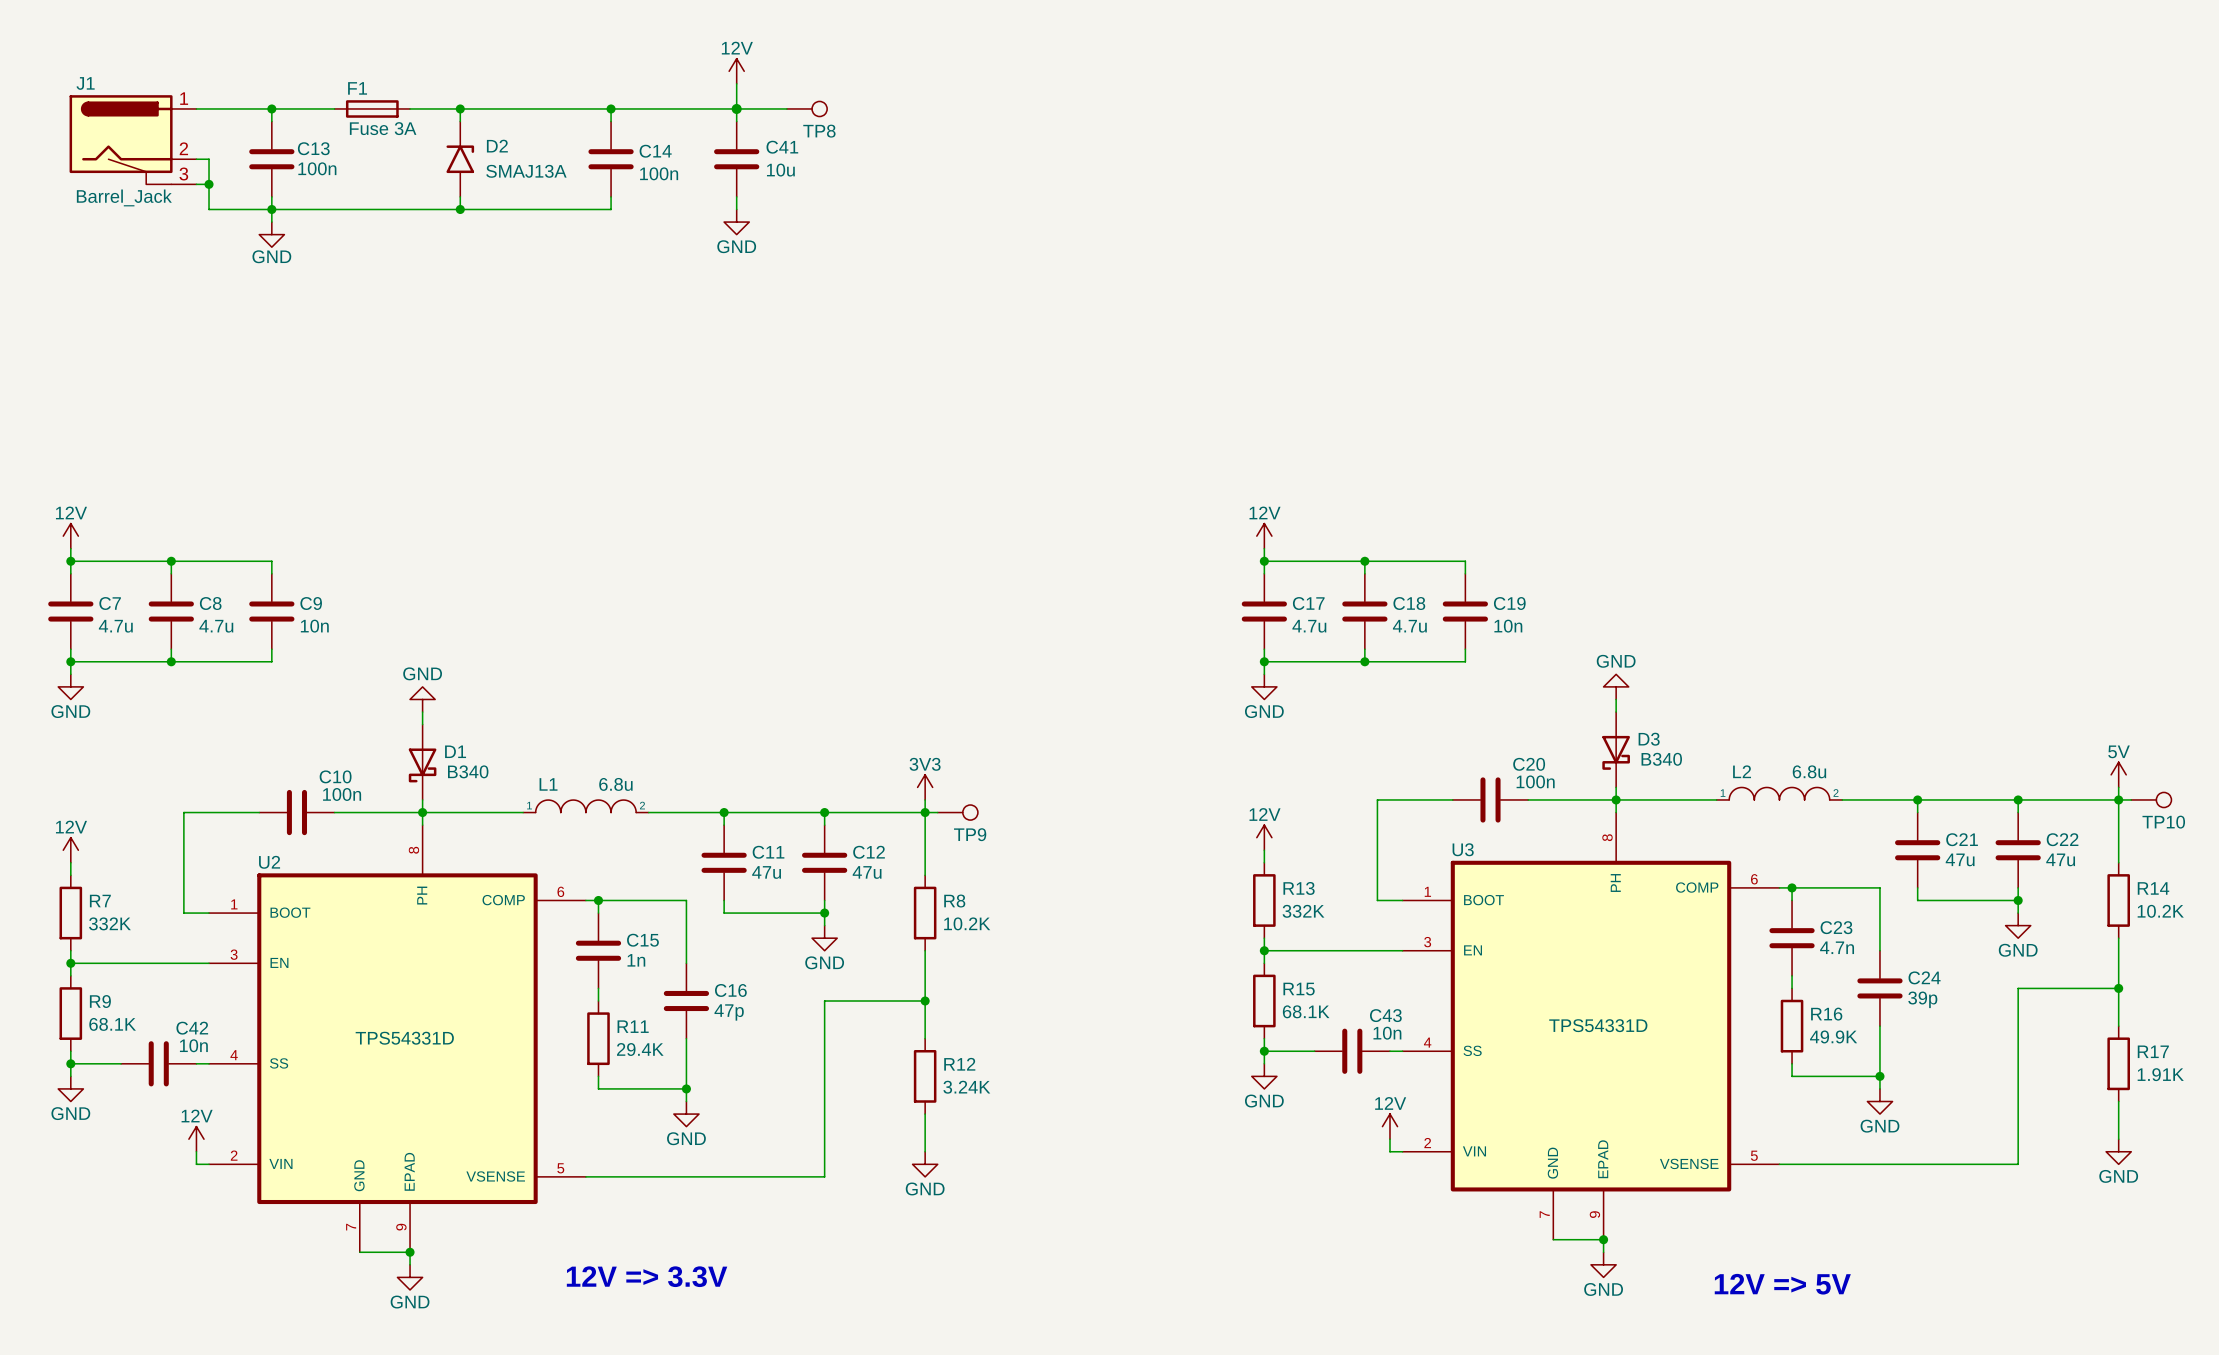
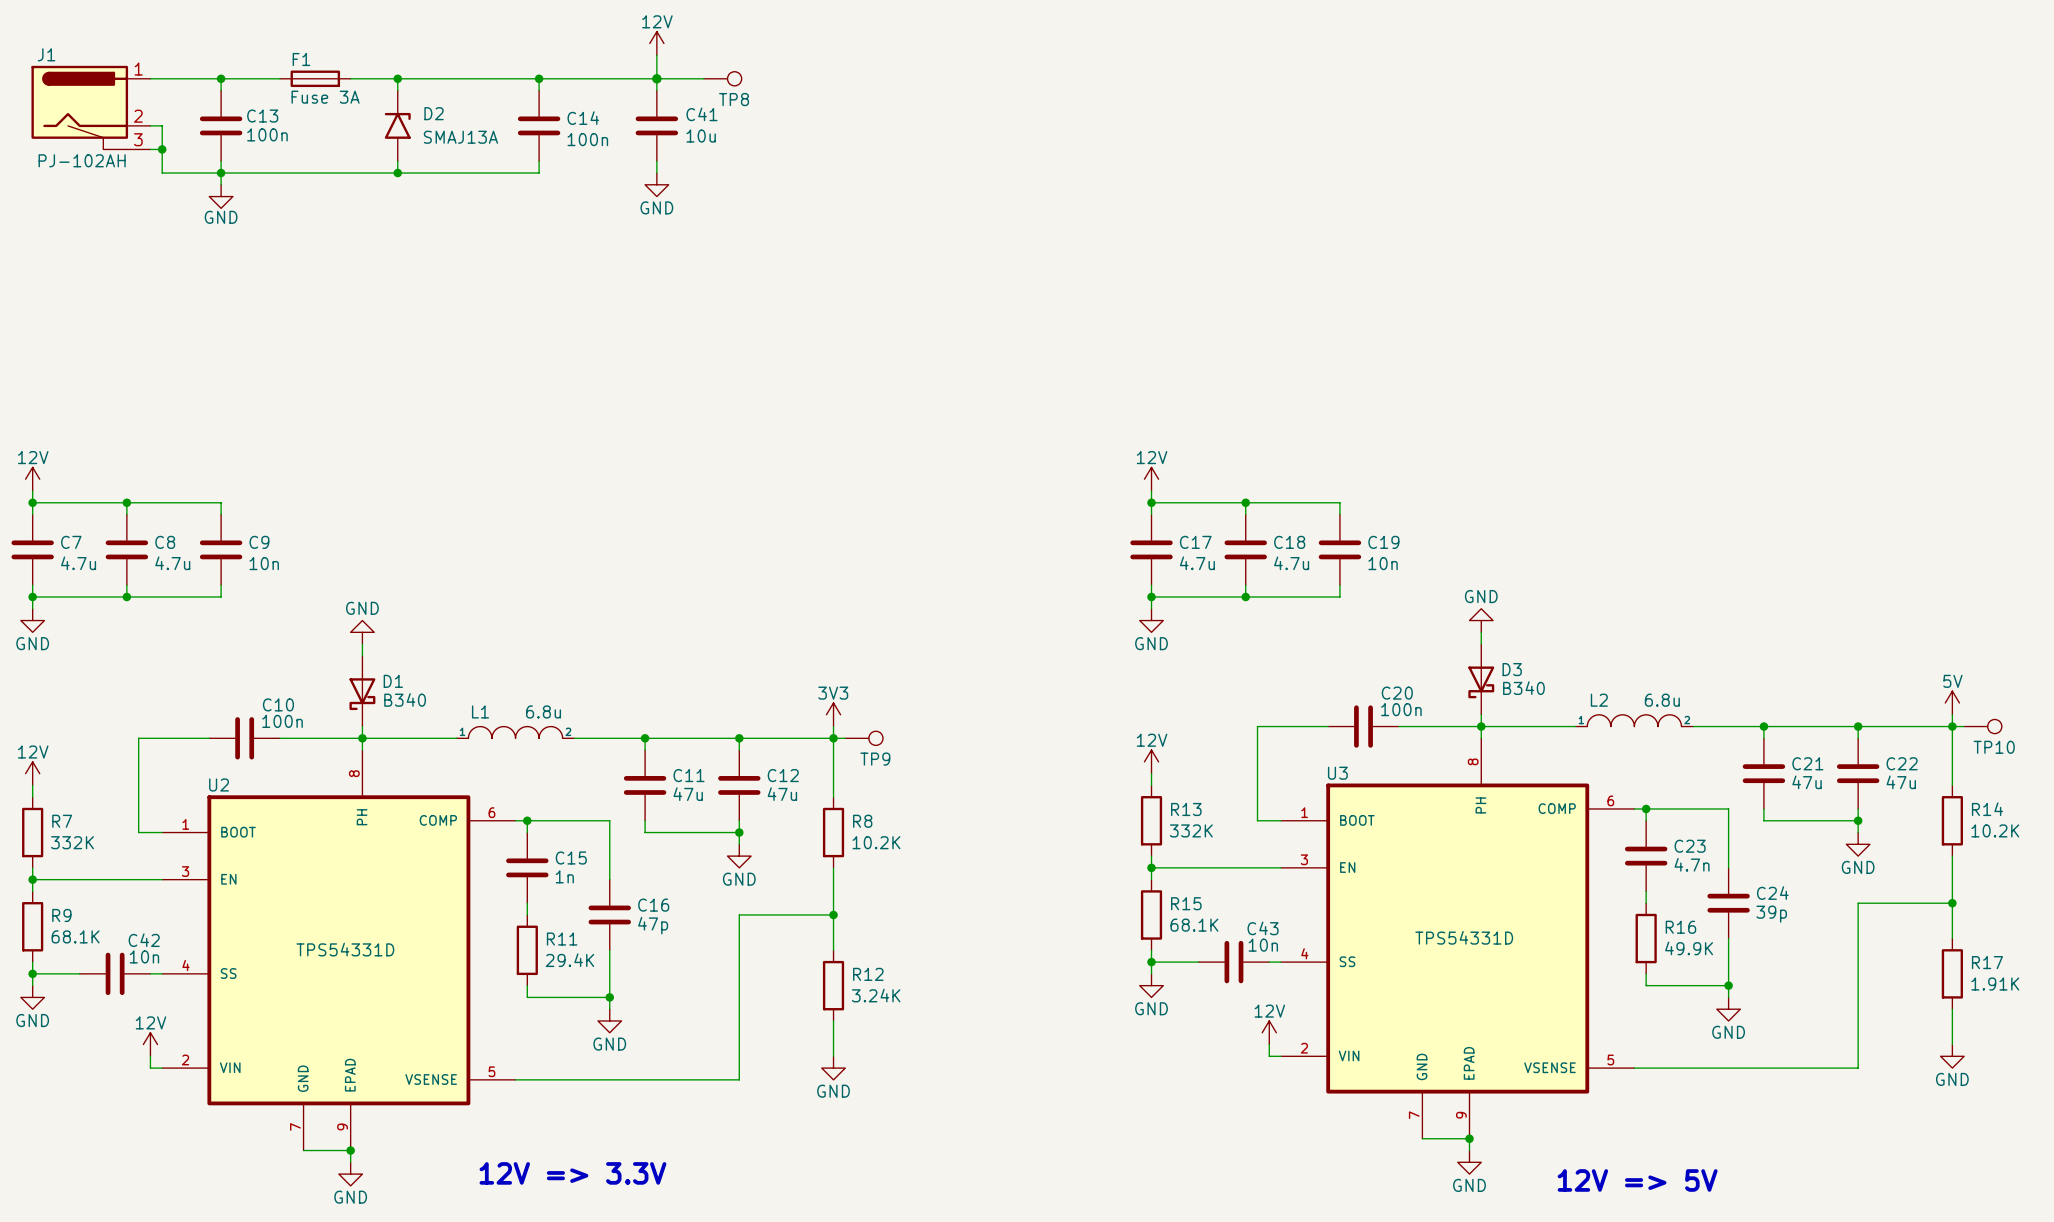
J1 value: Barrel_Jack (124, 197) -> PJ-102AH (82, 160)

